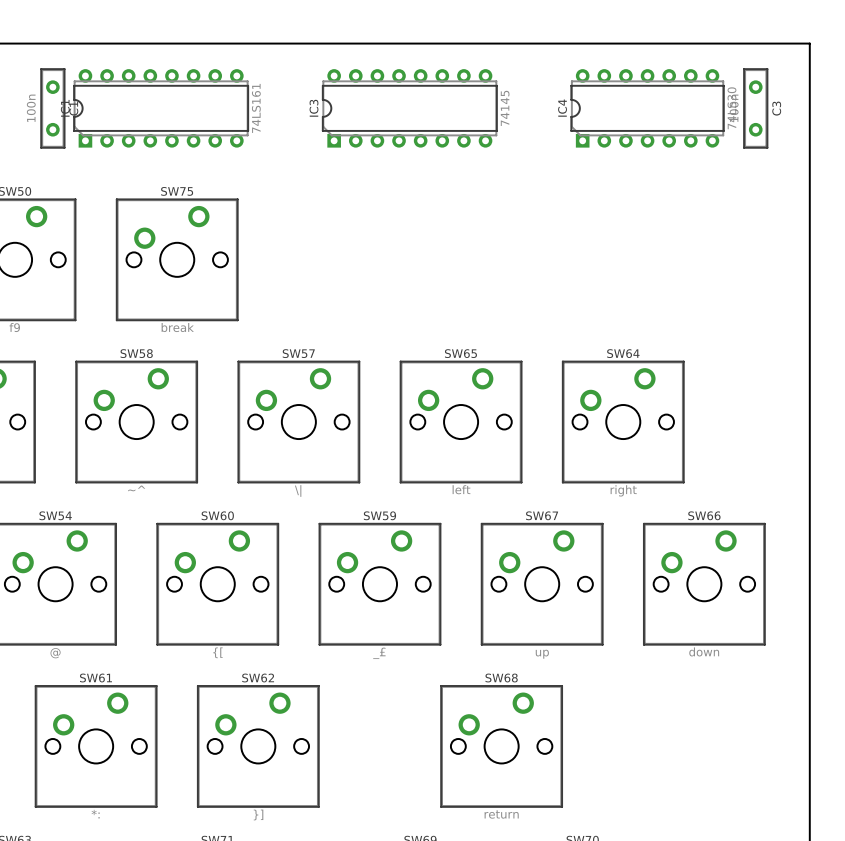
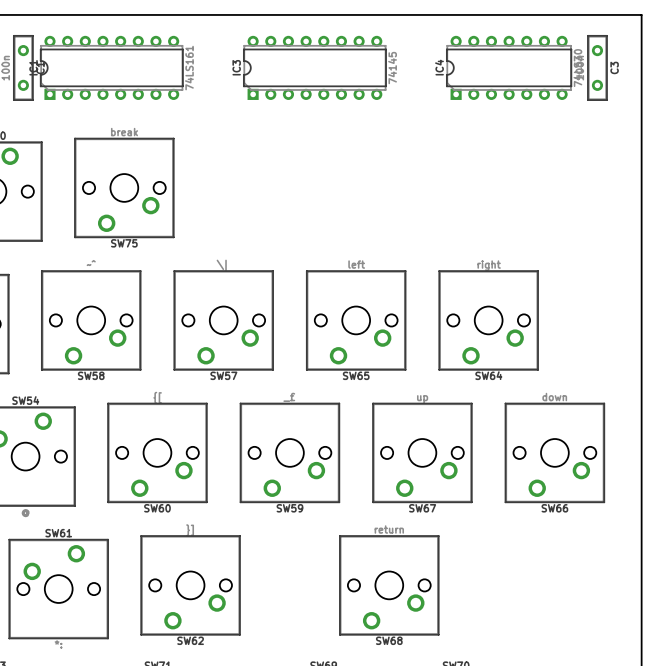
SW75 rotation: 0° (177, 259) -> 180° (124, 187)
SW58 rotation: 0° (136, 422) -> 180° (91, 320)
SW57 rotation: 0° (298, 422) -> 180° (223, 320)
SW65 rotation: 0° (461, 422) -> 180° (356, 320)
SW64 rotation: 0° (623, 422) -> 180° (488, 320)
SW60 rotation: 0° (217, 584) -> 180° (157, 452)
SW59 rotation: 0° (379, 584) -> 180° (289, 452)
SW67 rotation: 0° (542, 584) -> 180° (422, 452)
SW66 rotation: 0° (704, 584) -> 180° (554, 452)
SW62 rotation: 0° (258, 746) -> 180° (190, 585)
SW68 rotation: 0° (501, 746) -> 180° (389, 585)

